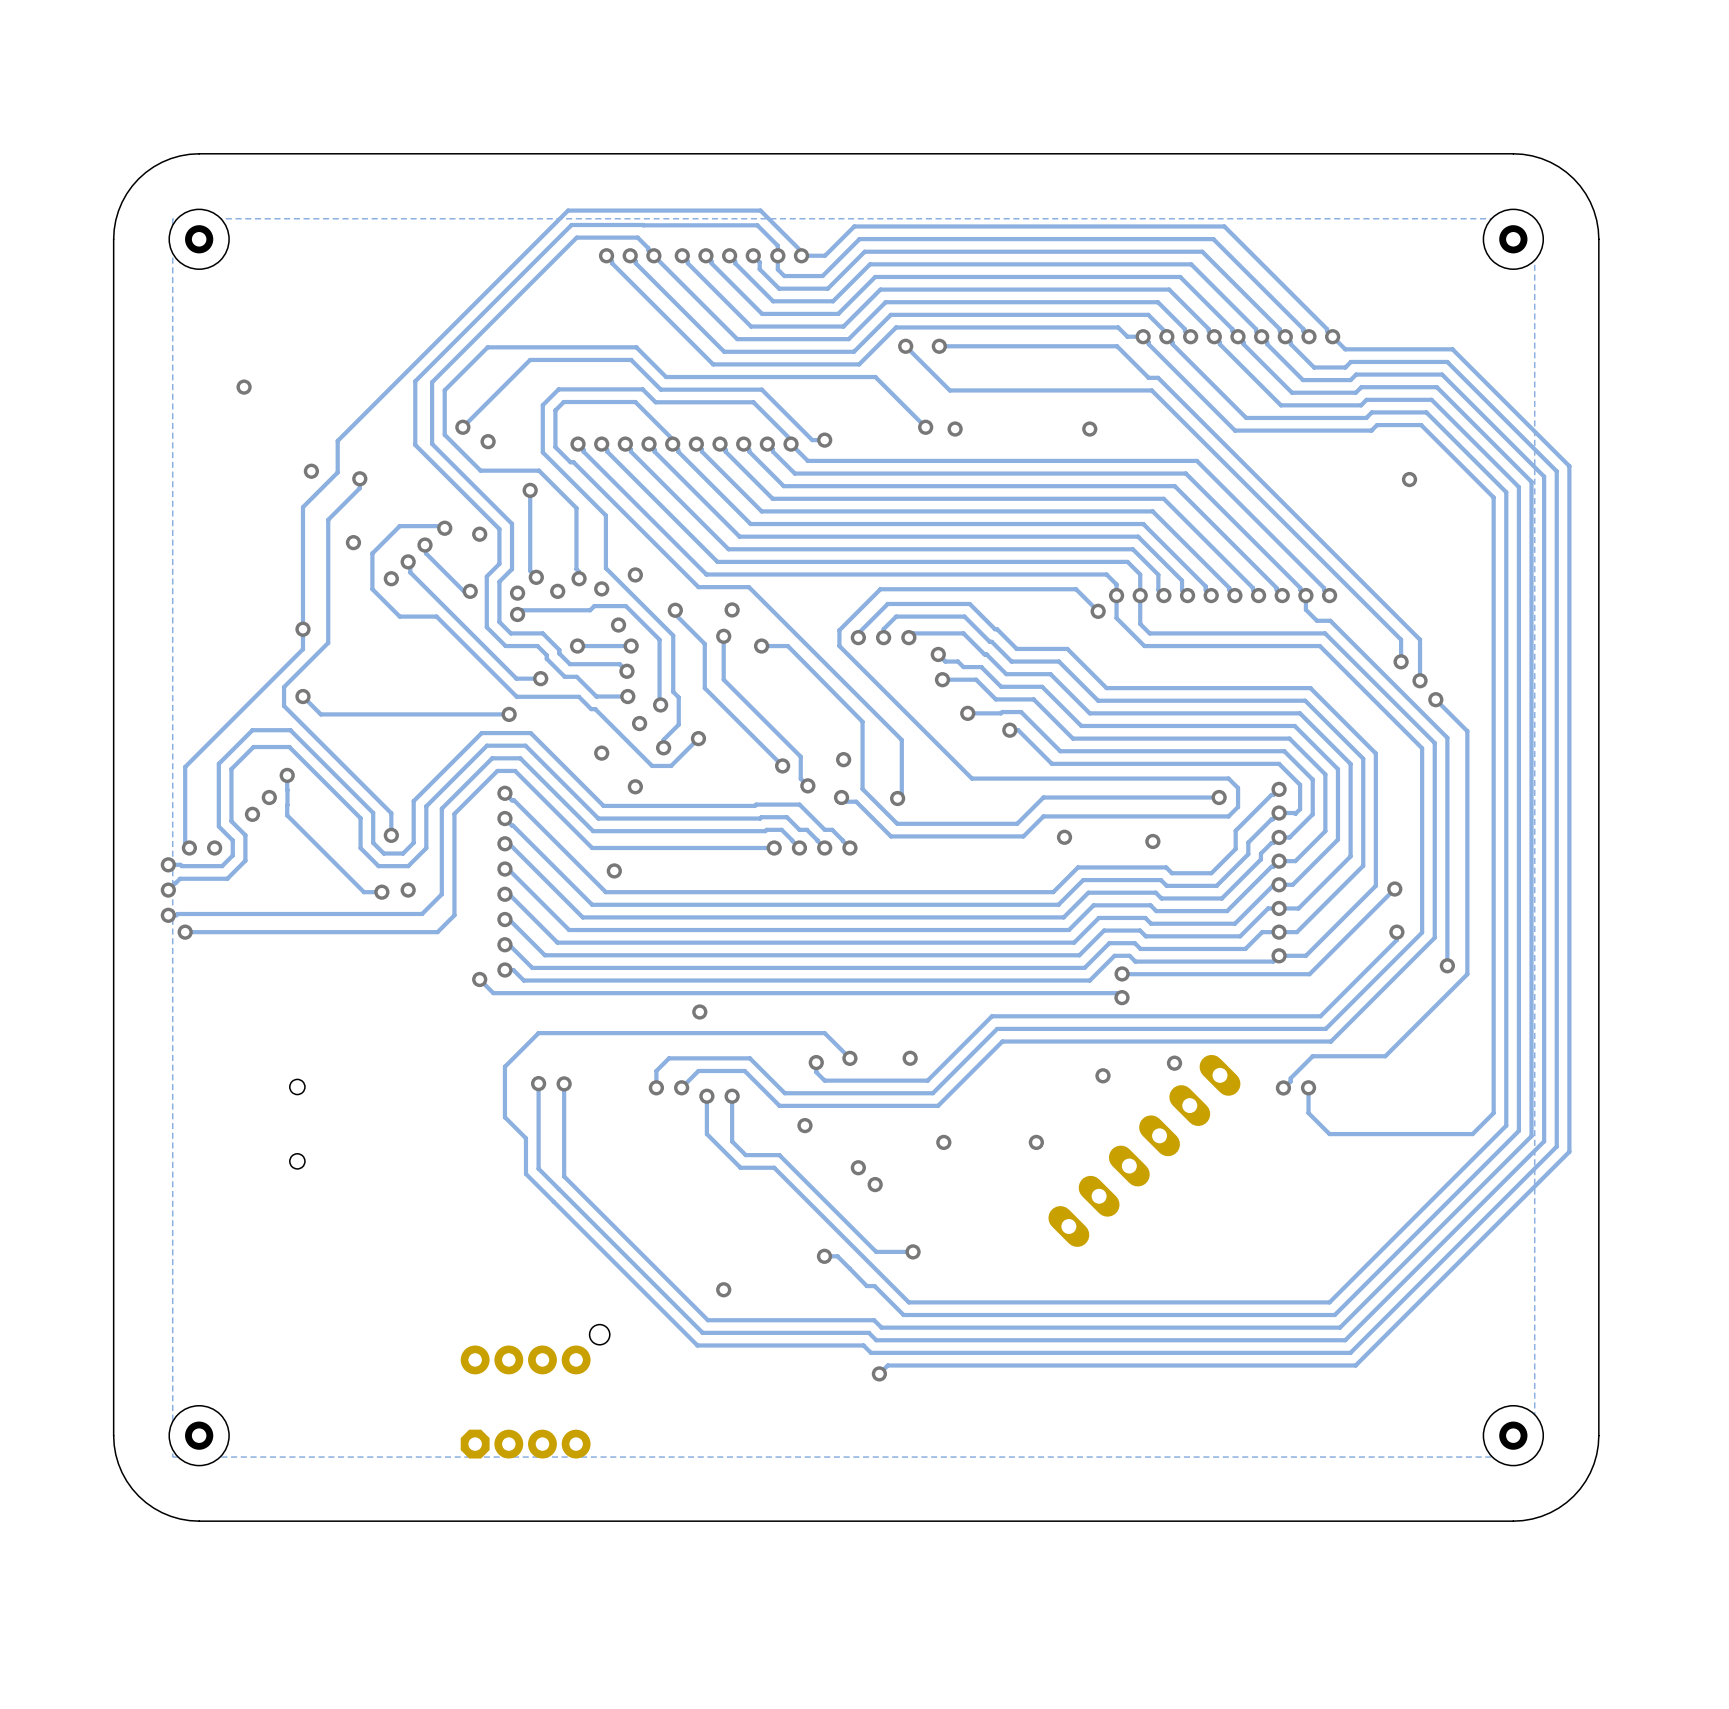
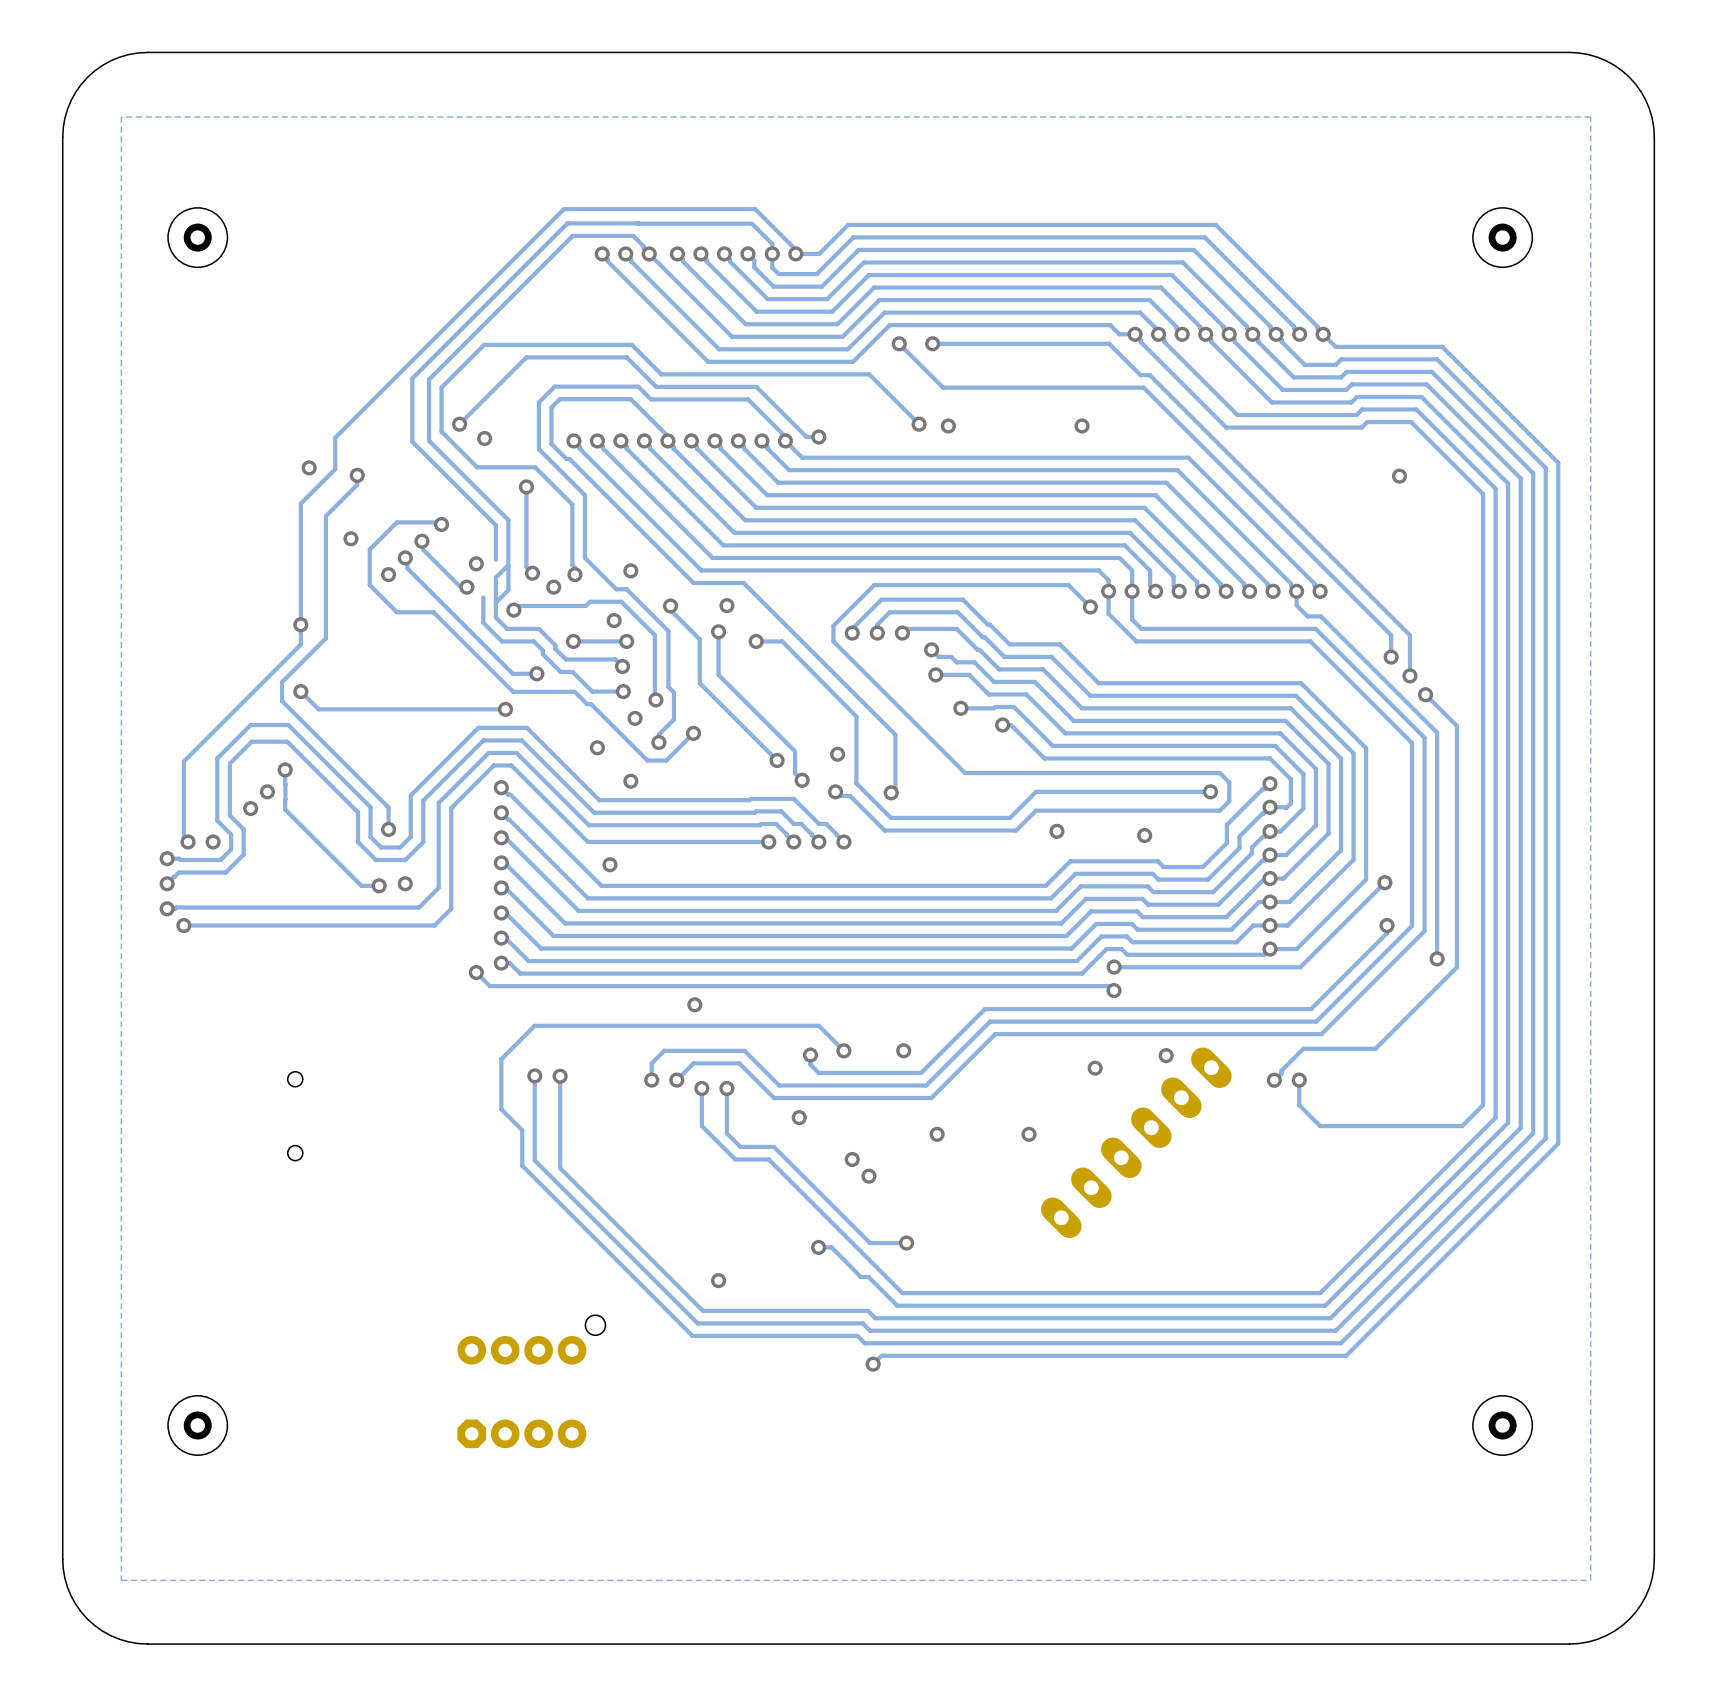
board edge: (1513, 153) (199, 153) (180, 155) (162, 162) (138, 178) (122, 202) (115, 220) (113, 239) (113, 1435) (115, 1454) (122, 1472) (138, 1496) (162, 1512) (180, 1519) (199, 1521) (1513, 1521) (1532, 1519) (1550, 1512) (1573, 1496) (1590, 1472) (1596, 1454) (1598, 1435) (1598, 239) (1596, 220) (1590, 202) (1573, 178) (1550, 162) (1532, 155) (1513, 153) -> (1569, 52) (1588, 54) (1606, 60) (1629, 77) (1645, 100) (1652, 118) (1654, 137) (1654, 1559) (1652, 1578) (1645, 1596) (1629, 1619) (1606, 1635) (1588, 1641) (1569, 1644) (147, 1644) (128, 1641) (110, 1635) (87, 1619) (71, 1596) (64, 1578) (62, 1559) (62, 137) (64, 118) (71, 100) (87, 77) (110, 60) (128, 54) (147, 52) (1569, 52)
zone outline: (1534, 218) (172, 218) (172, 1457) (1534, 1457) (1534, 218) -> (1590, 116) (1590, 1580) (121, 1580) (121, 116) (1590, 116)
via: (244, 387) -> none
track: (589, 498) (605, 515) (605, 568) (631, 593) -> (584, 495) (584, 557) (616, 589) (626, 589)
via: (479, 534) -> none
track: (499, 563) (486, 576) (486, 601) -> none
via: none -> (476, 563)
track: none -> (508, 565) (508, 590) (495, 602)
via: (601, 588) -> none
via: (517, 593) -> none

